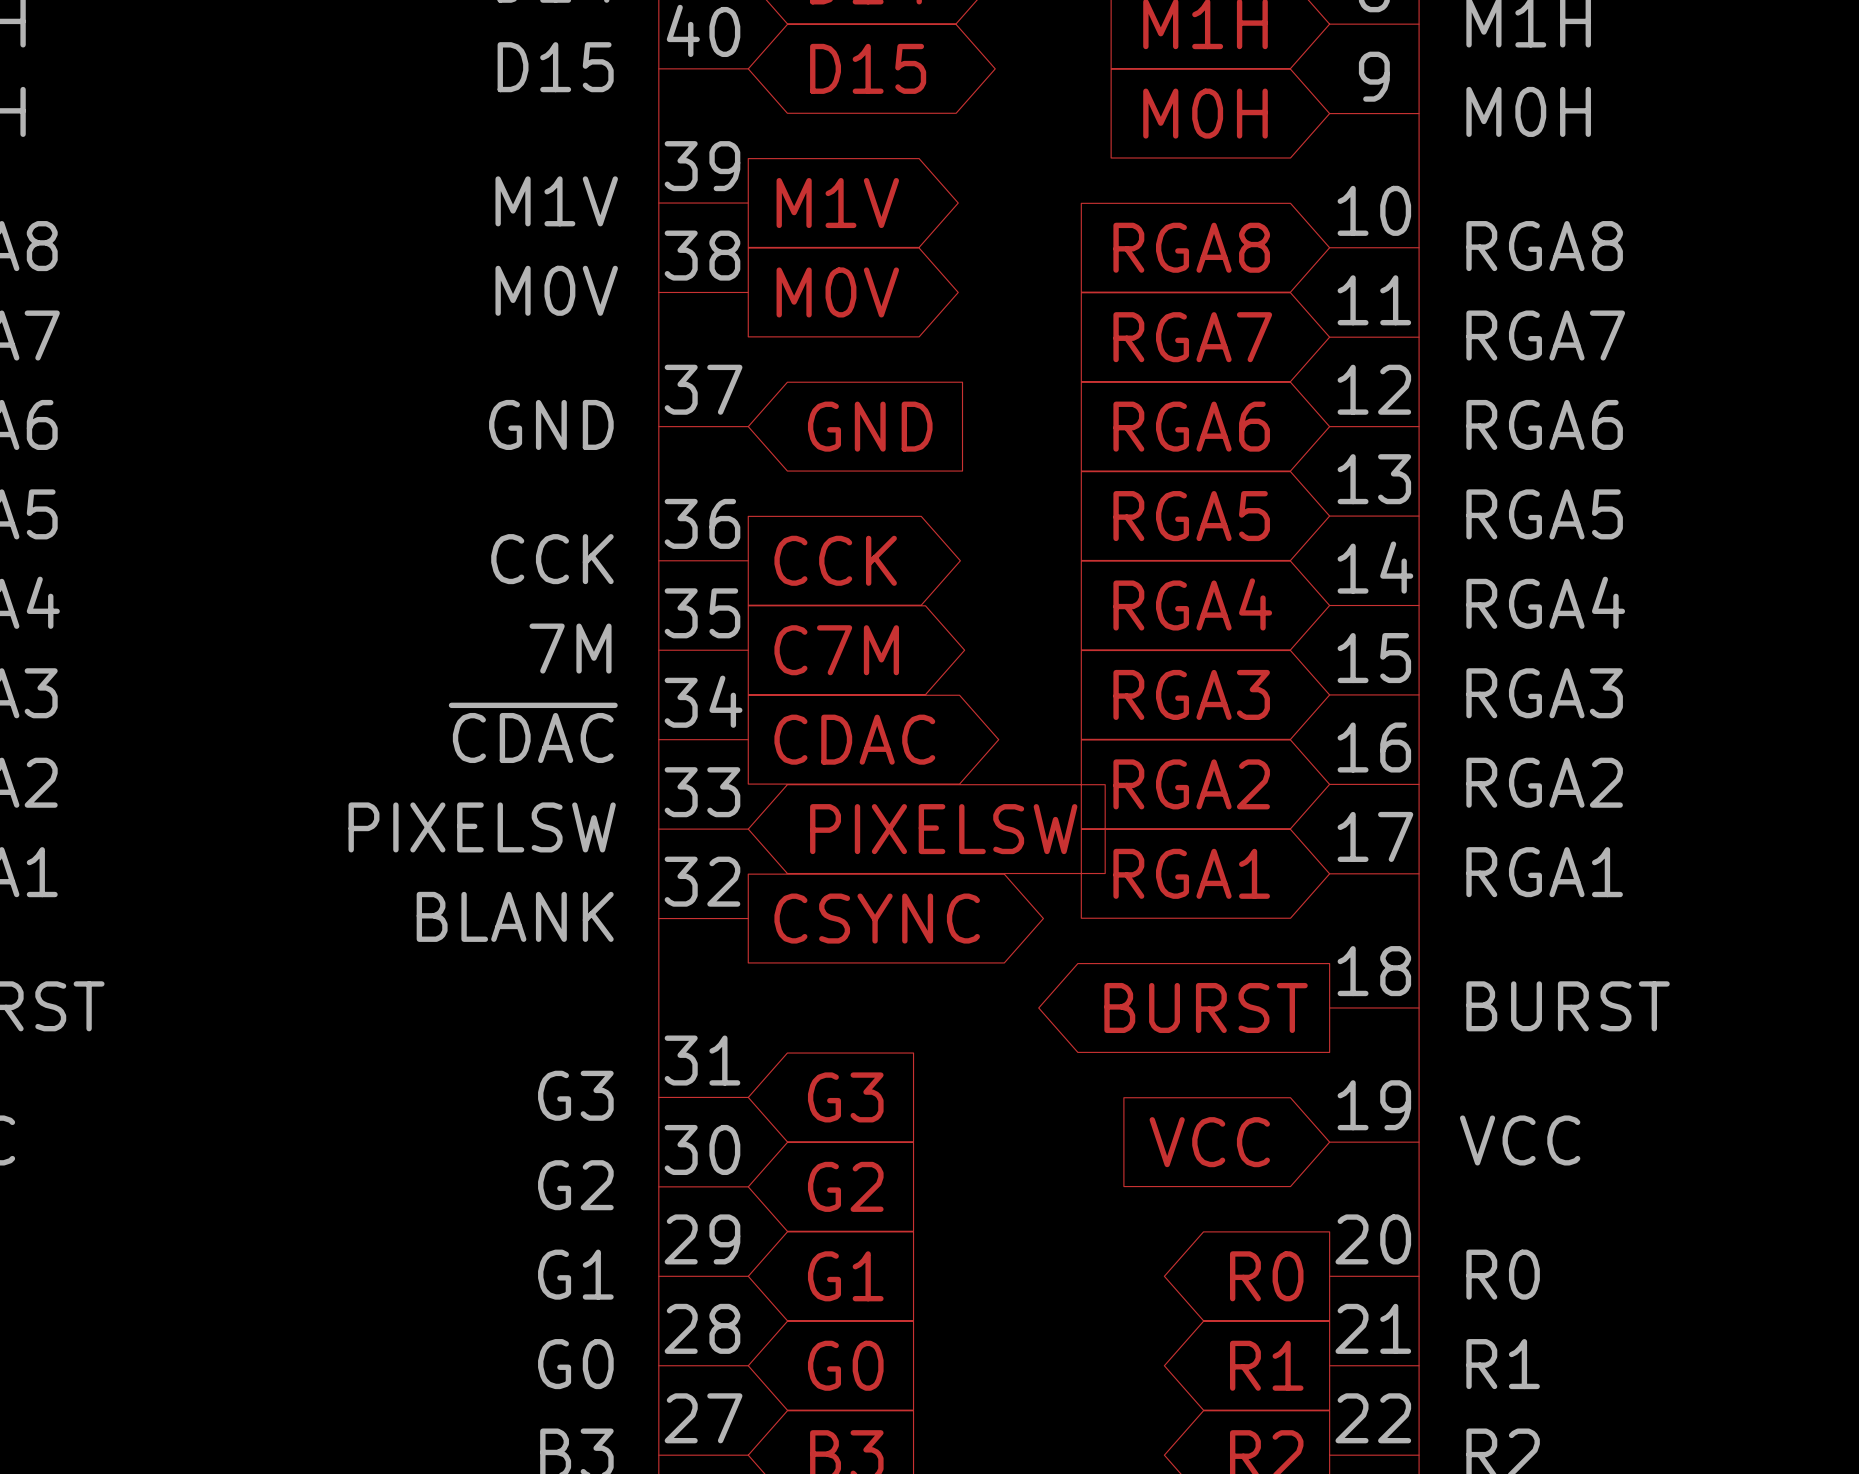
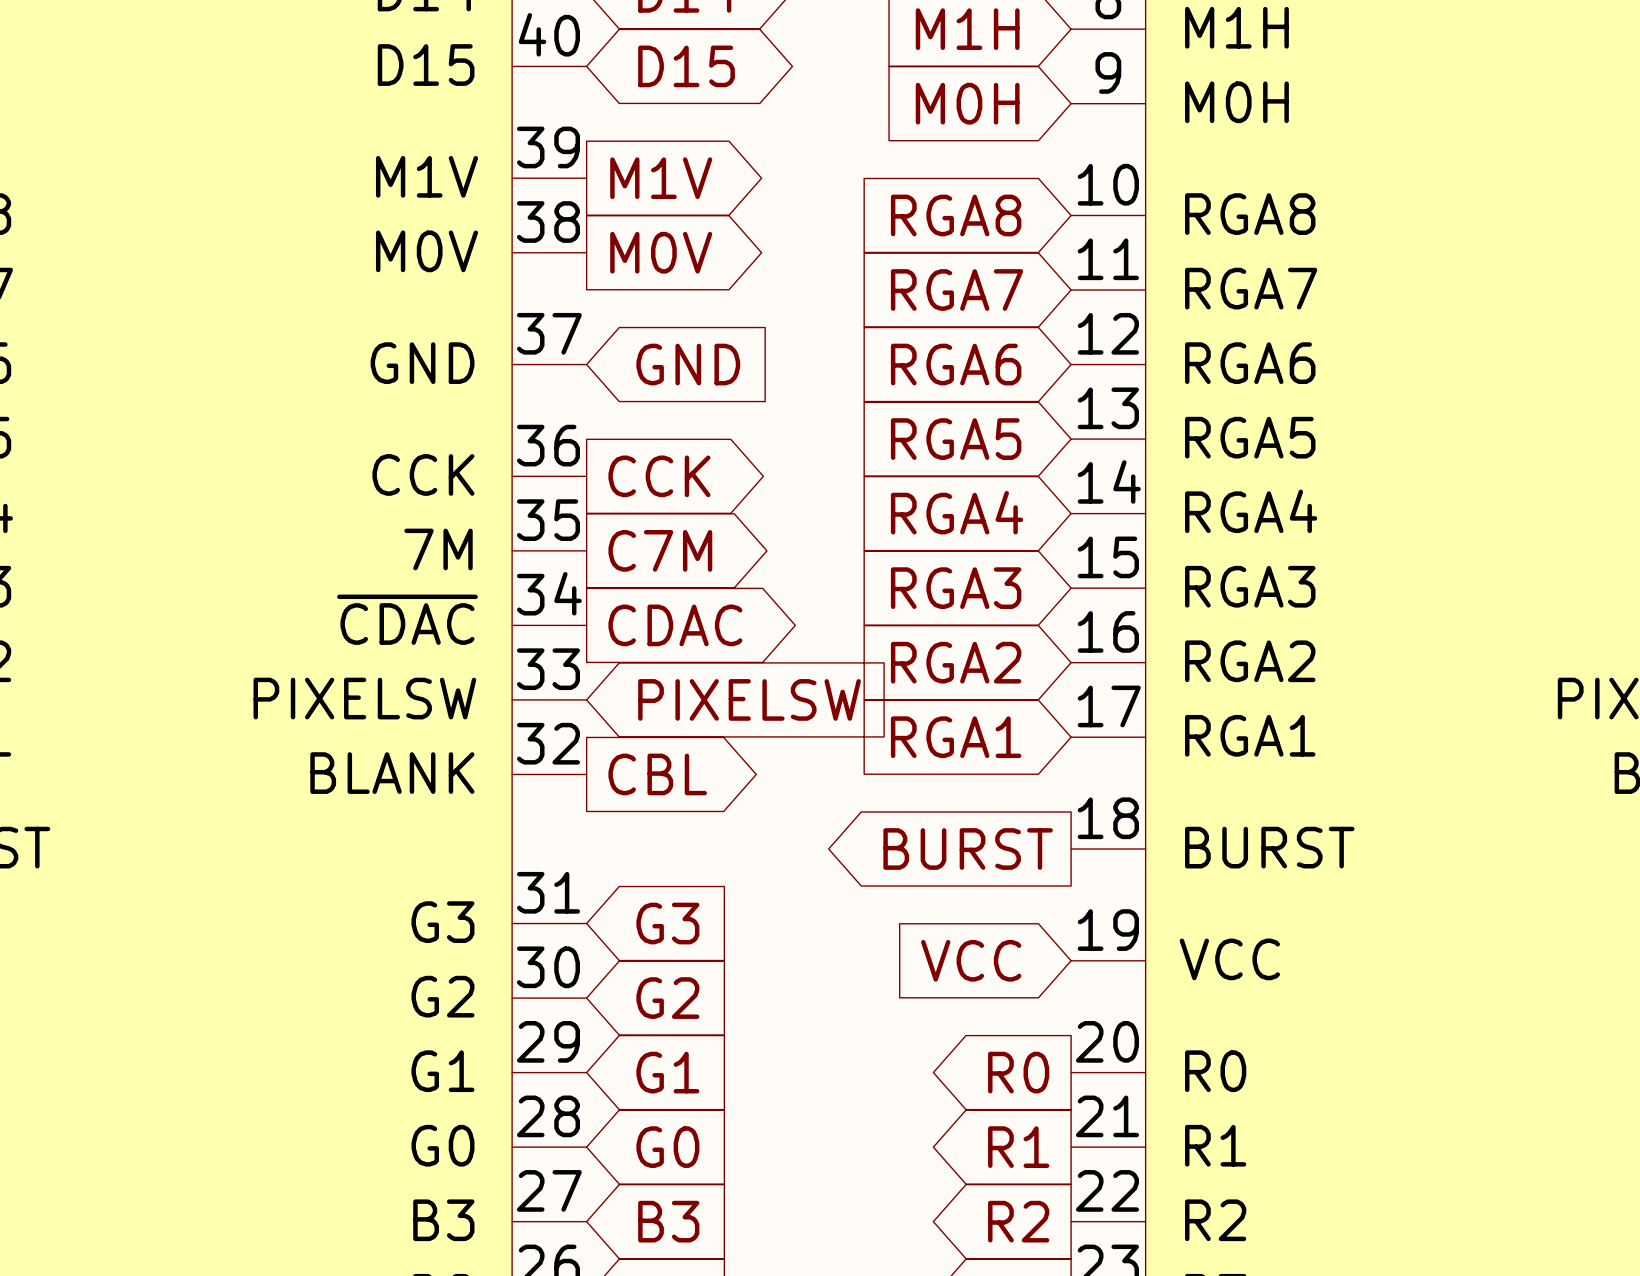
global label: CSYNC (877, 918) -> CBL (657, 774)

